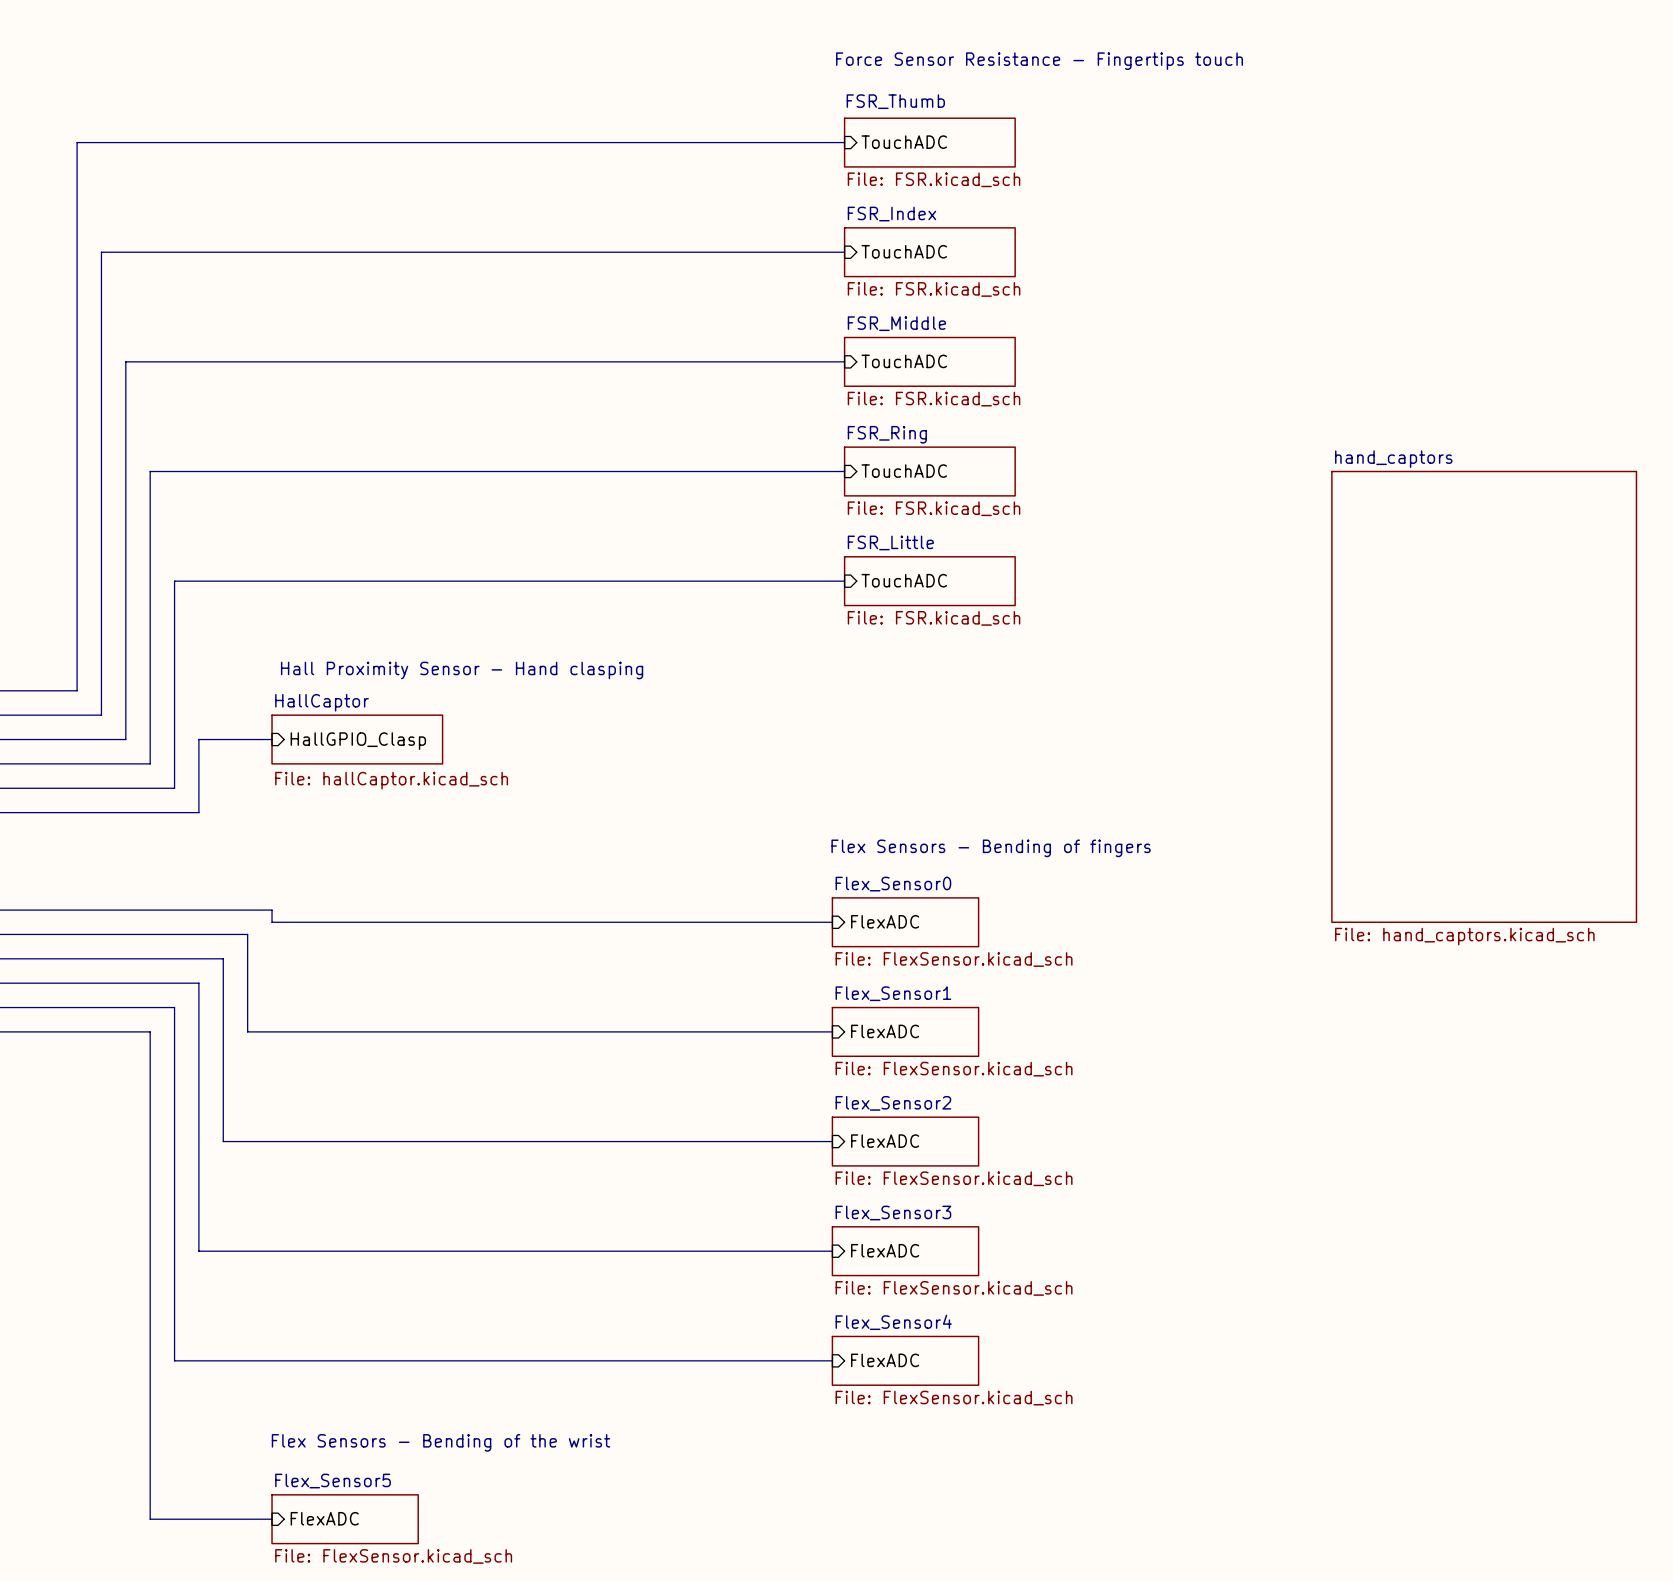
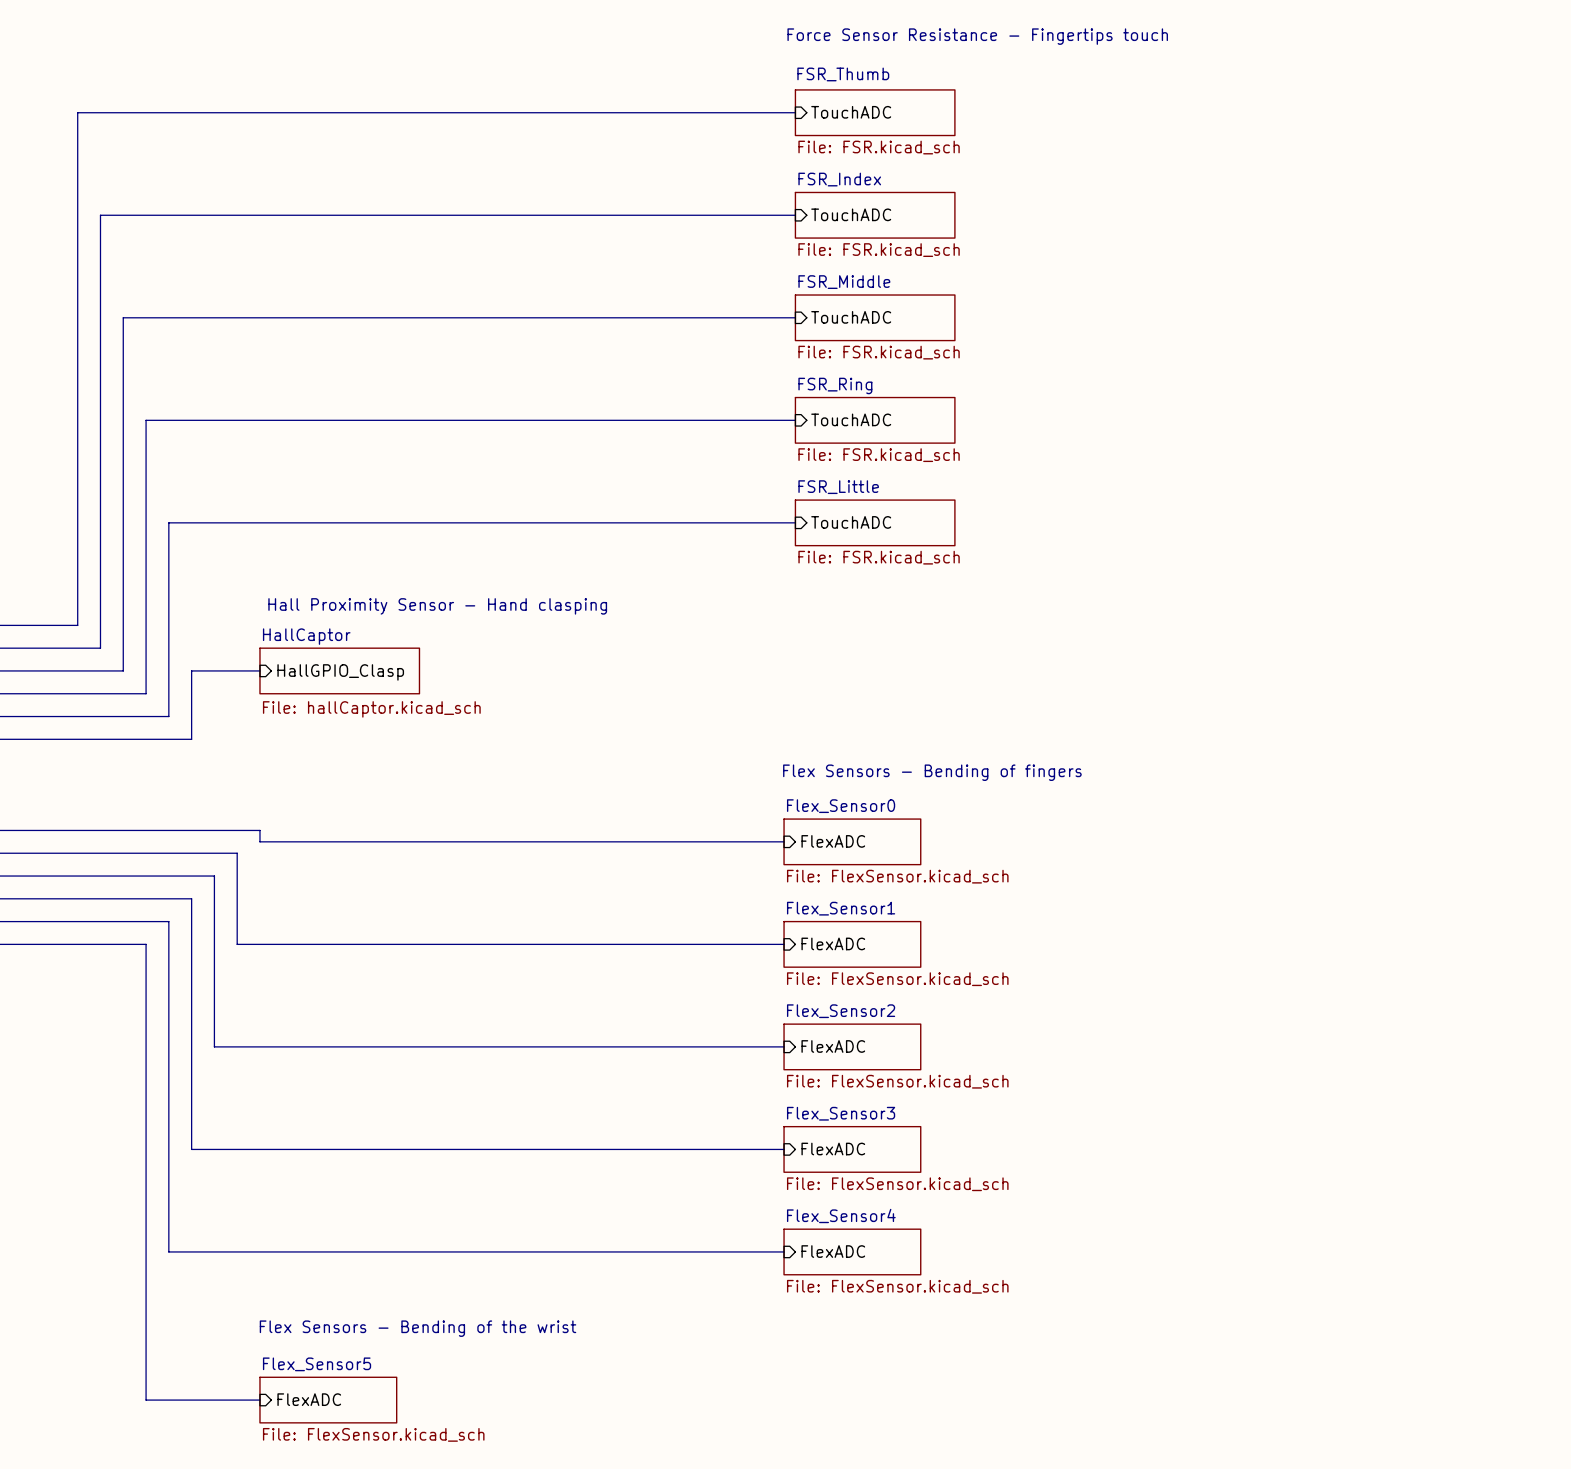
sheet hand_captors: File: hand_captors.kicad_sch (1484, 696) -> none

